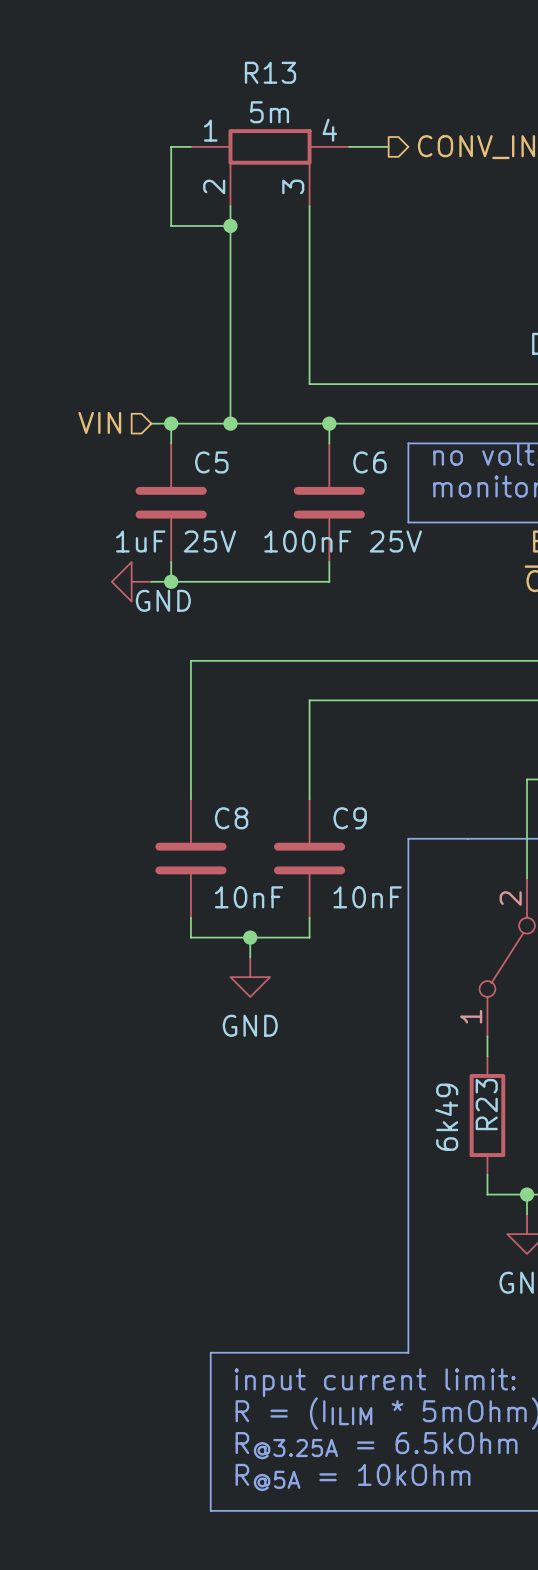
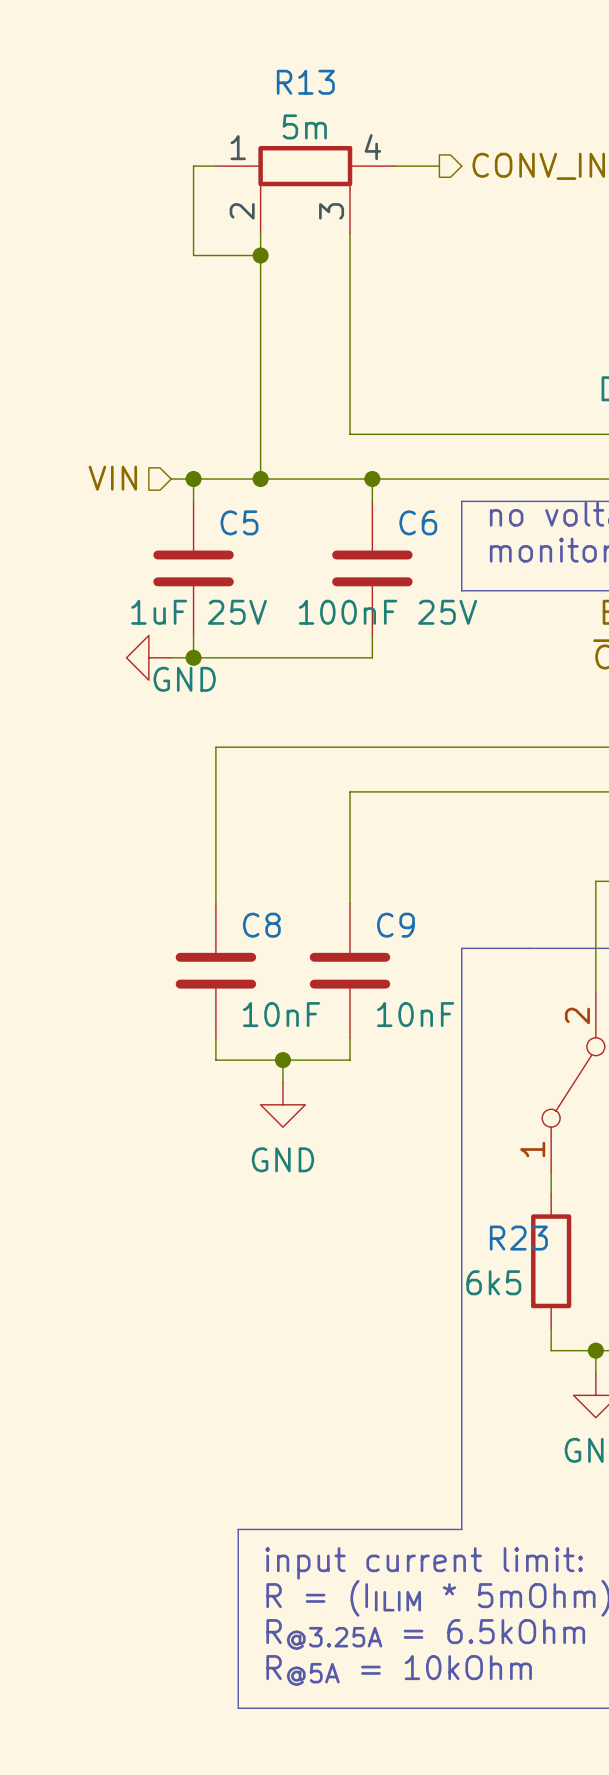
R23 name rotation: 0° (486, 1104) -> 90° clockwise (518, 1238)
R23 value: 6k49 (446, 1117) -> 6k5 (493, 1282)

